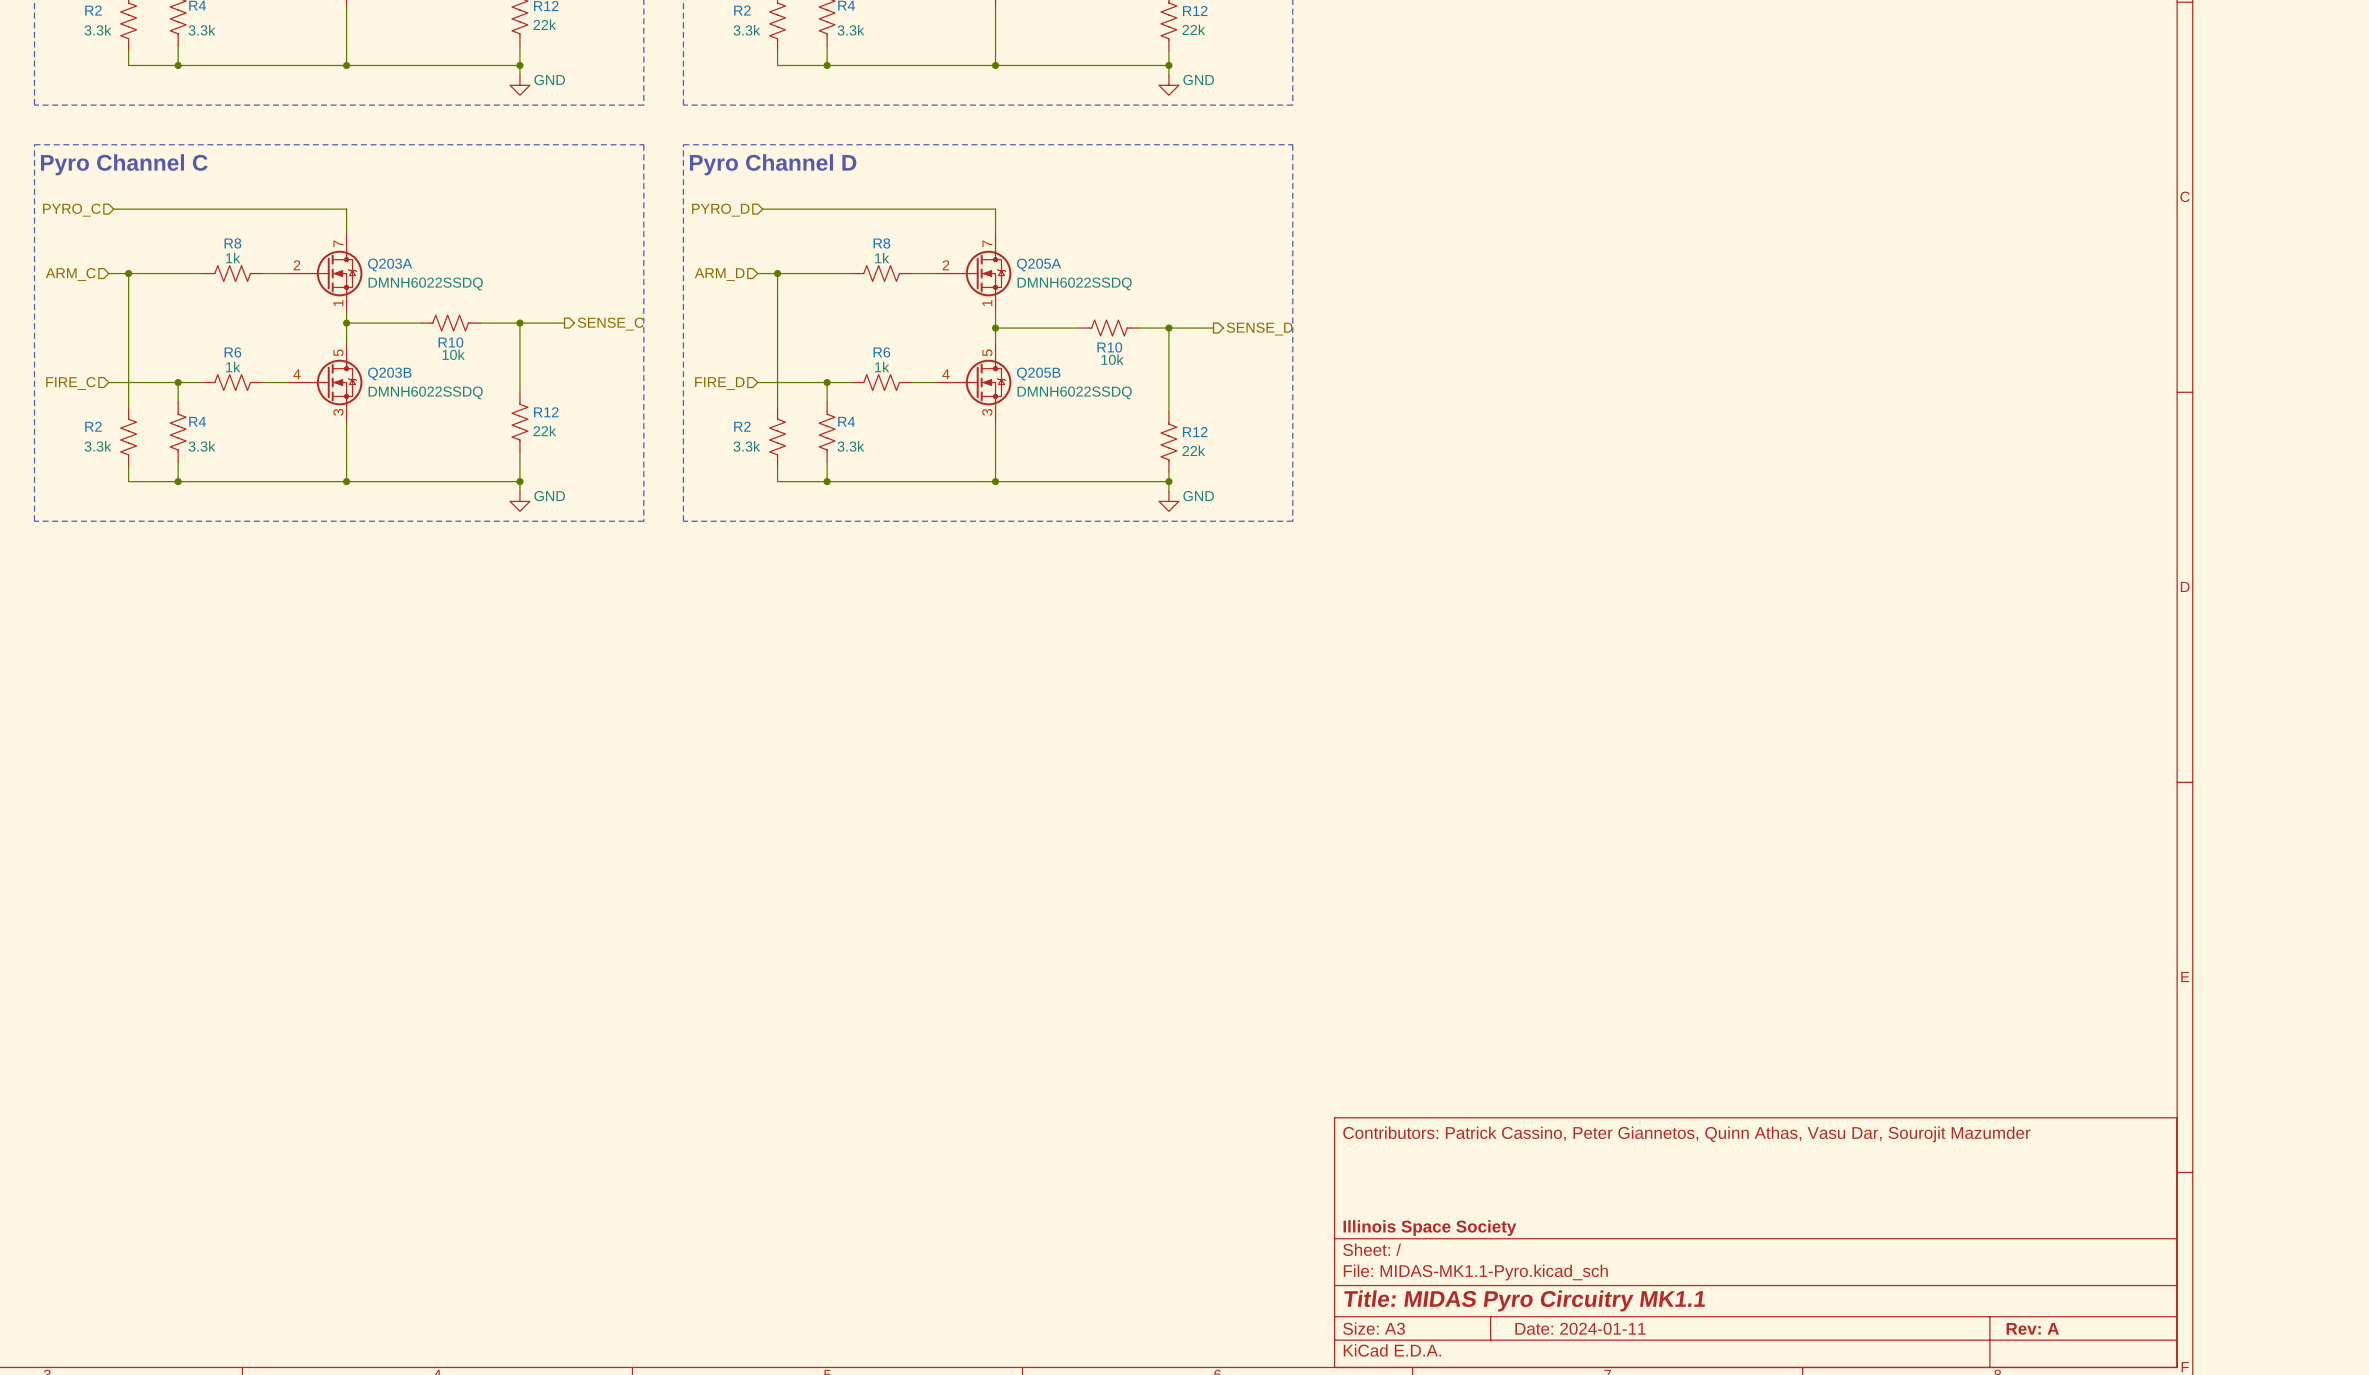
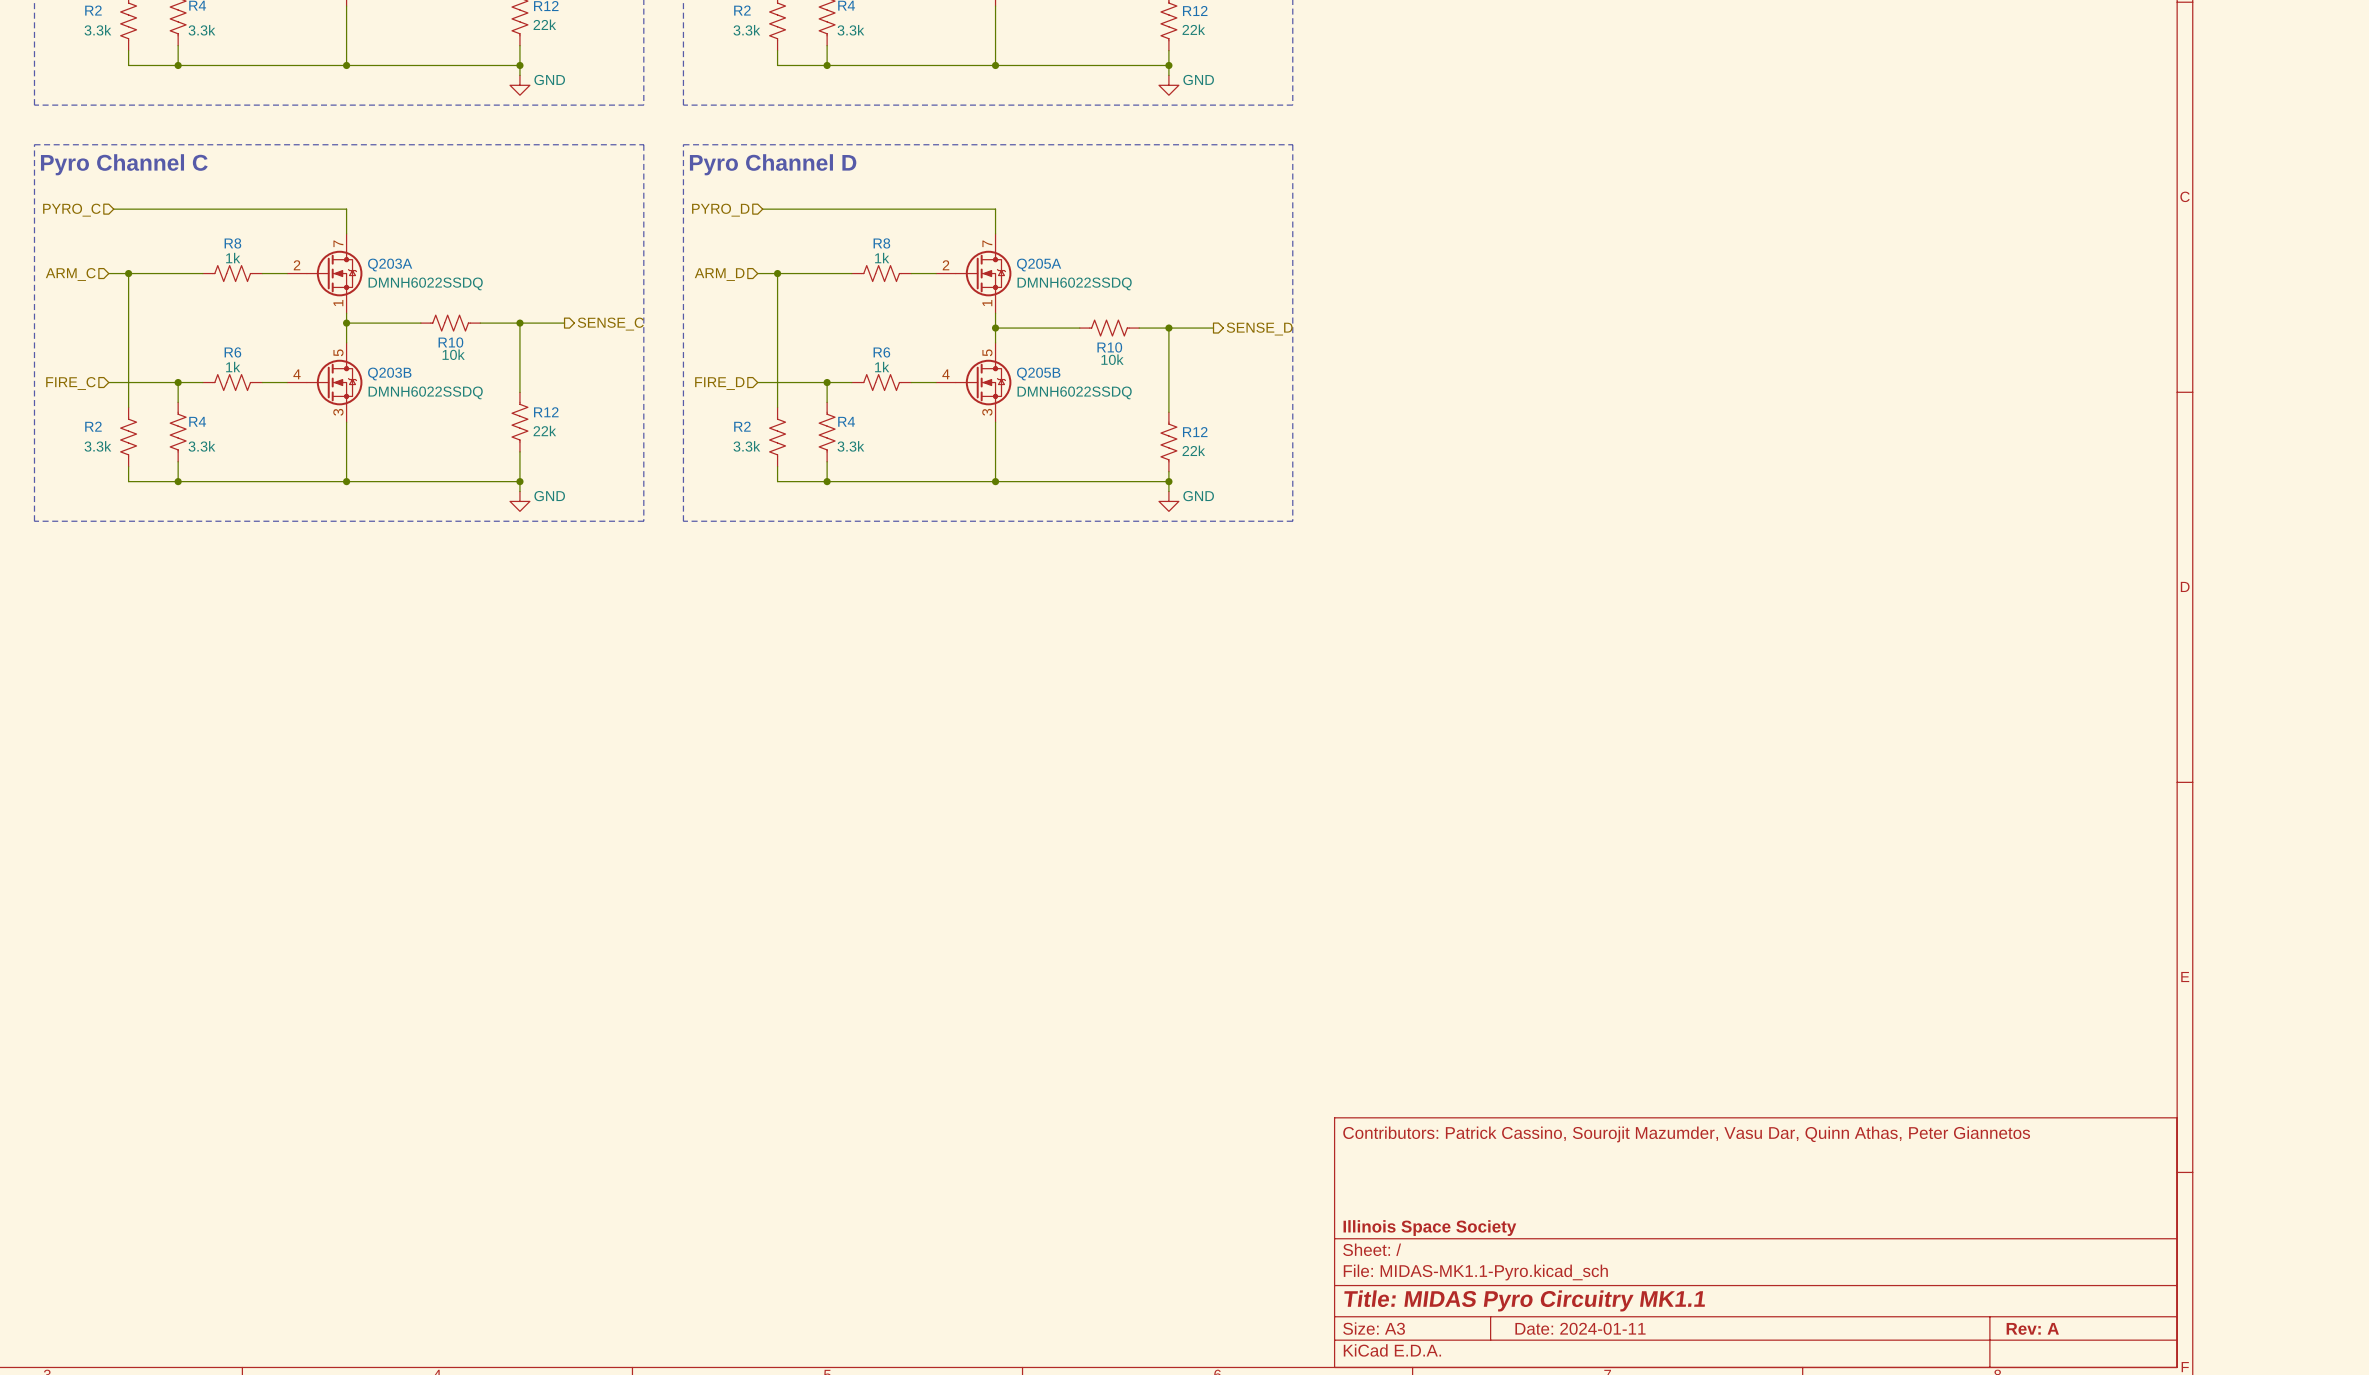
title block: Contributors: Patrick Cassino, Peter Giannetos, Quinn Athas, Vasu Dar, Sourojit Mazumder (1686, 1134) -> Contributors: Patrick Cassino, Sourojit Mazumder, Vasu Dar, Quinn Athas, Peter Giannetos (1686, 1134)

